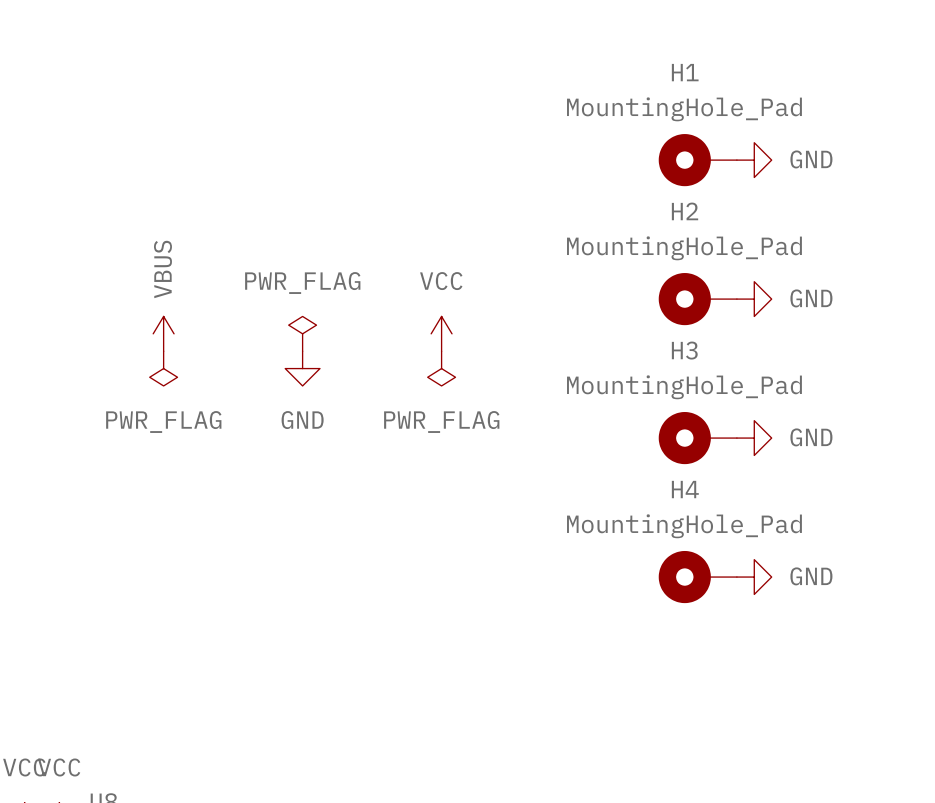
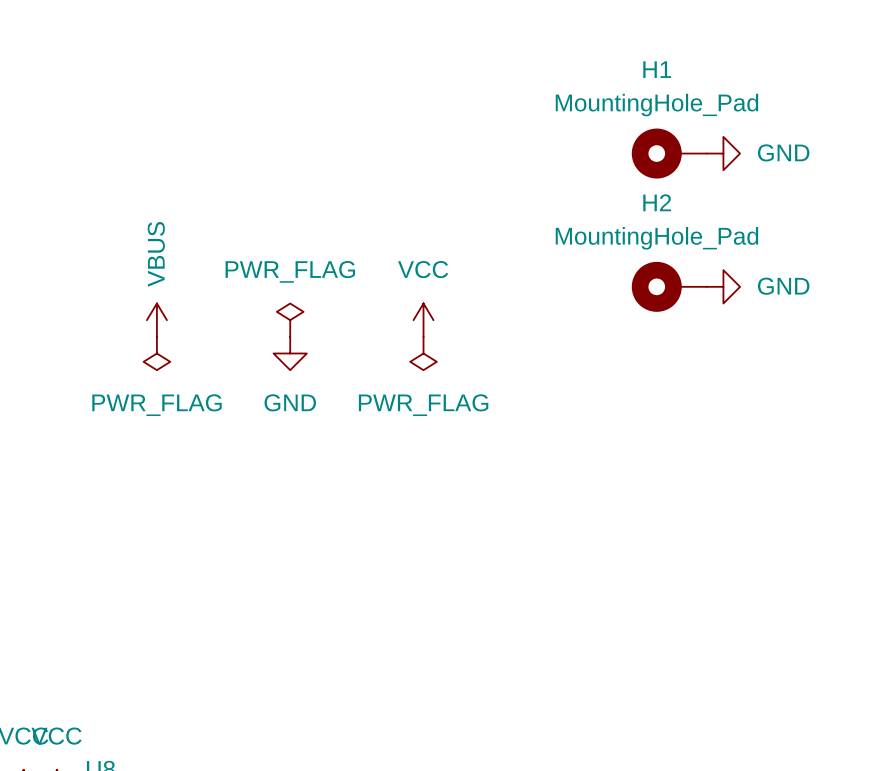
H3: MountingHole_Pad (697, 438) -> none
power symbol: GND (754, 438) -> none
H4: MountingHole_Pad (697, 577) -> none
power symbol: GND (754, 577) -> none

